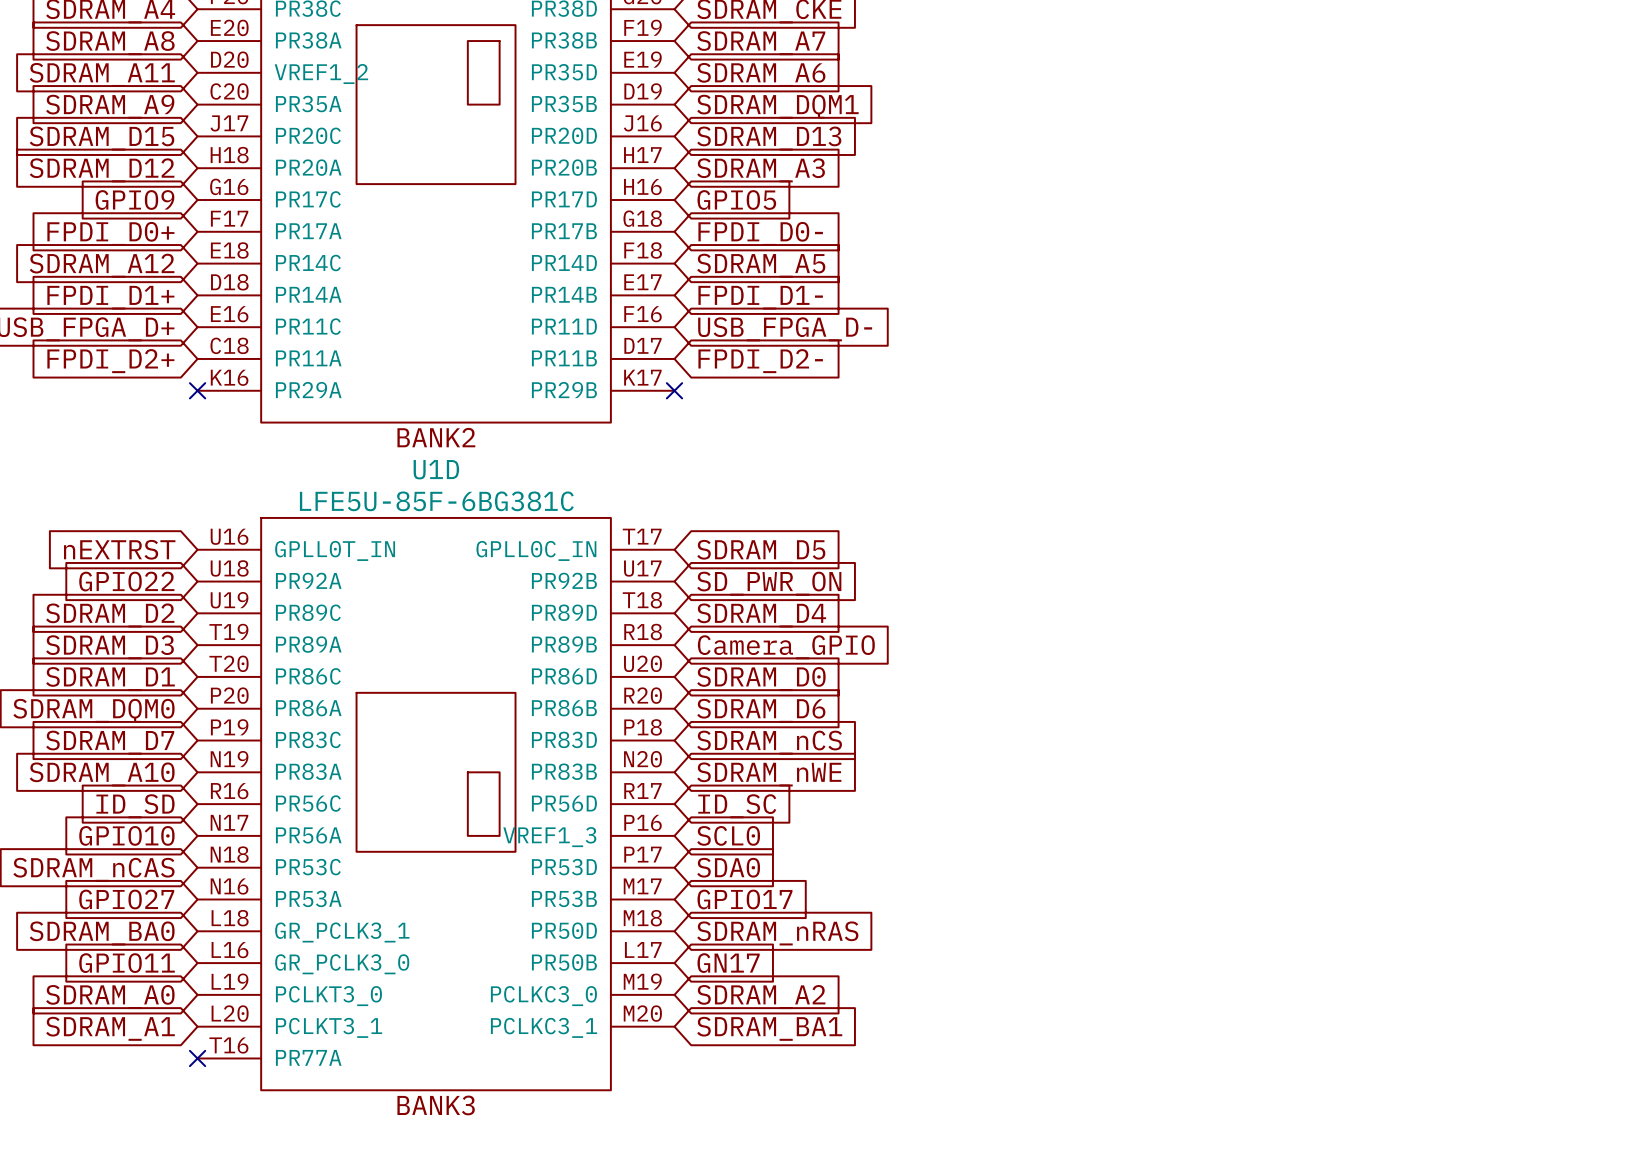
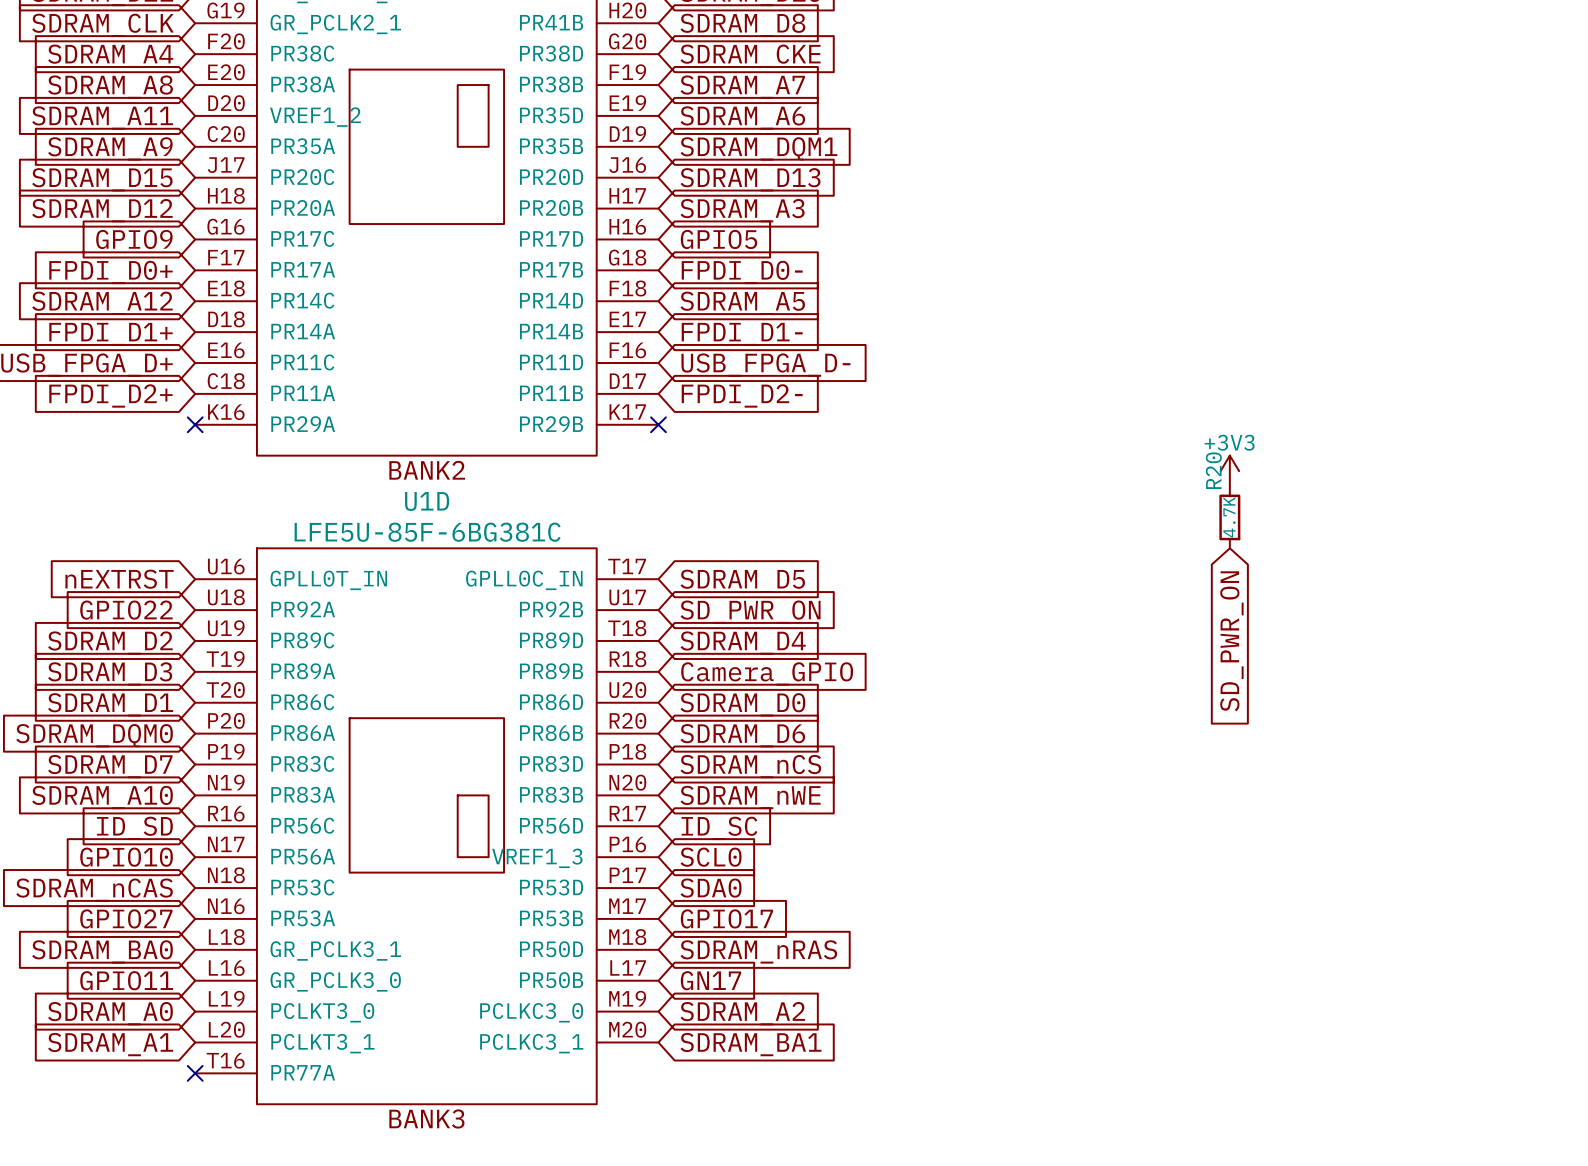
power symbol: none -> +3V3 (1229, 471)
R20: none -> 4.7K (1229, 517)
global label: none -> SD_PWR_ON (1231, 641)

